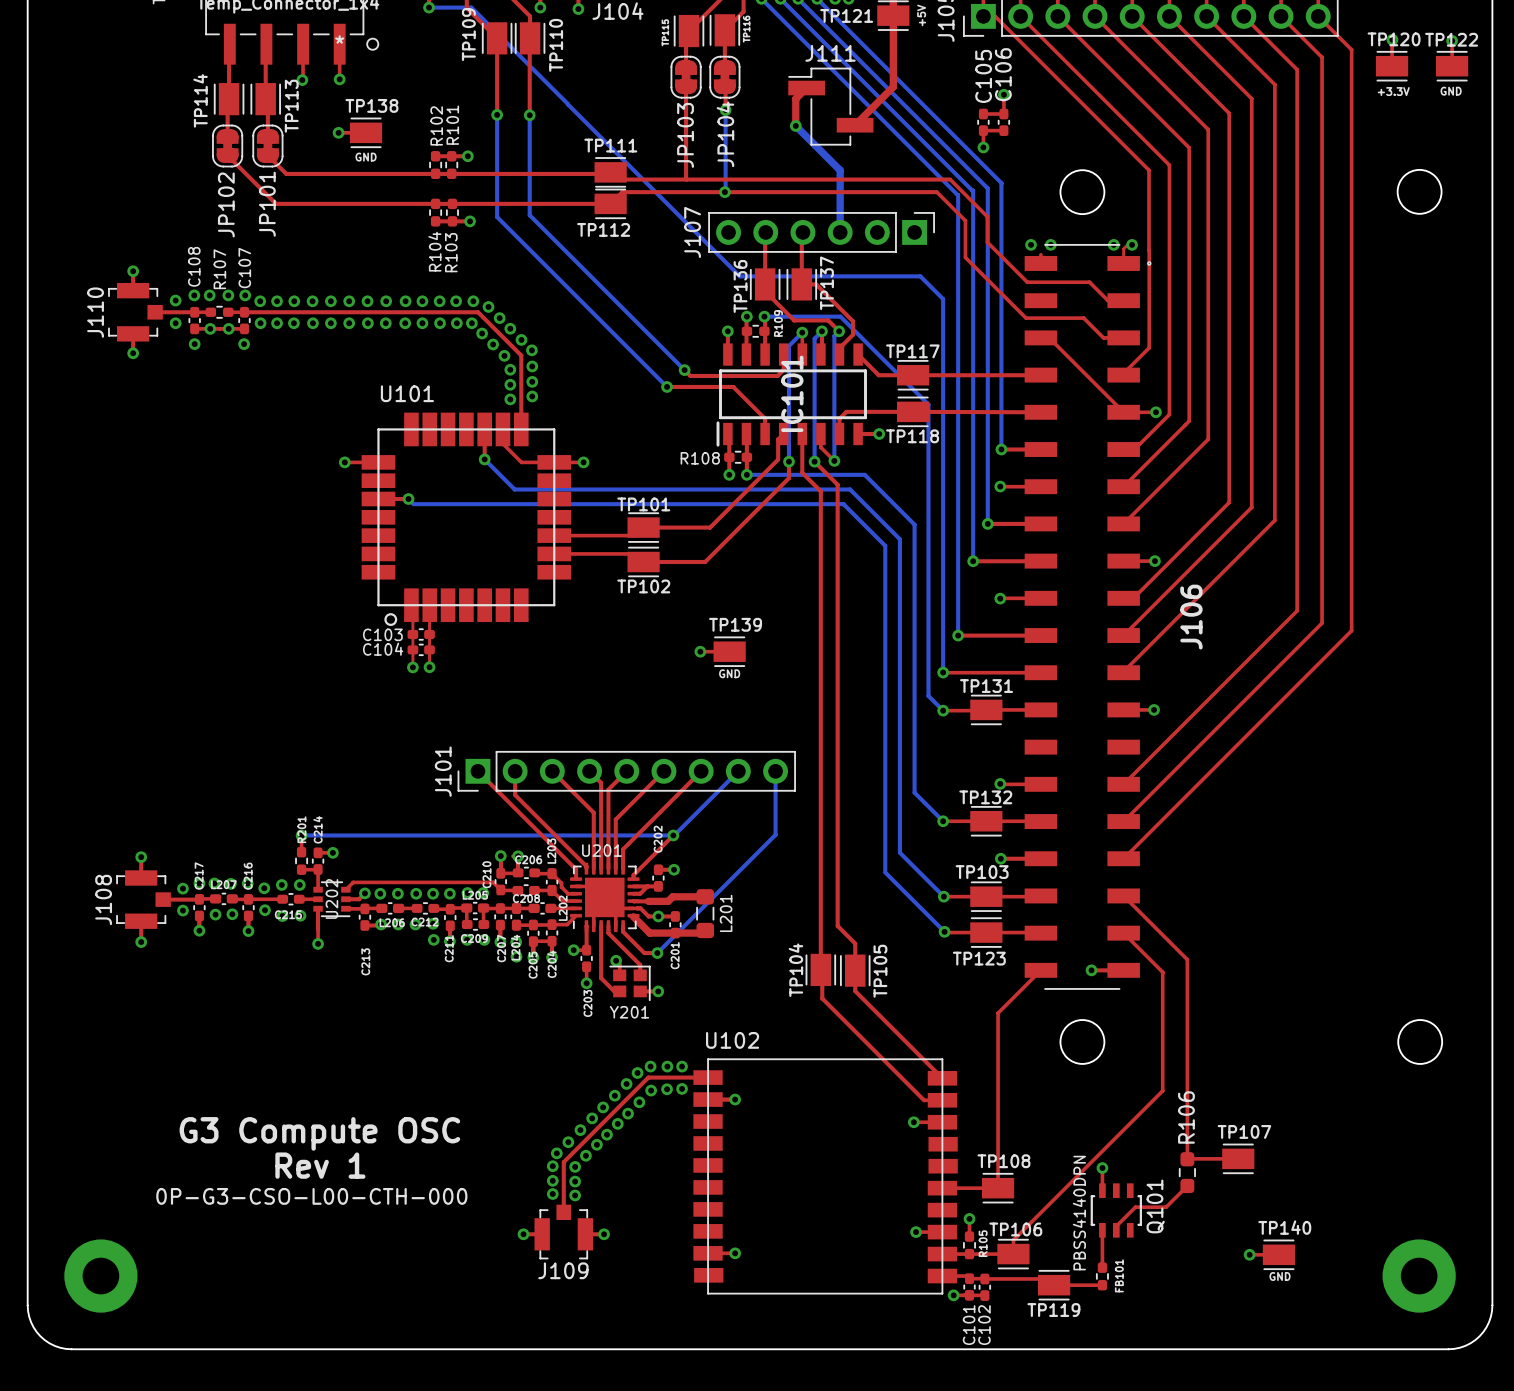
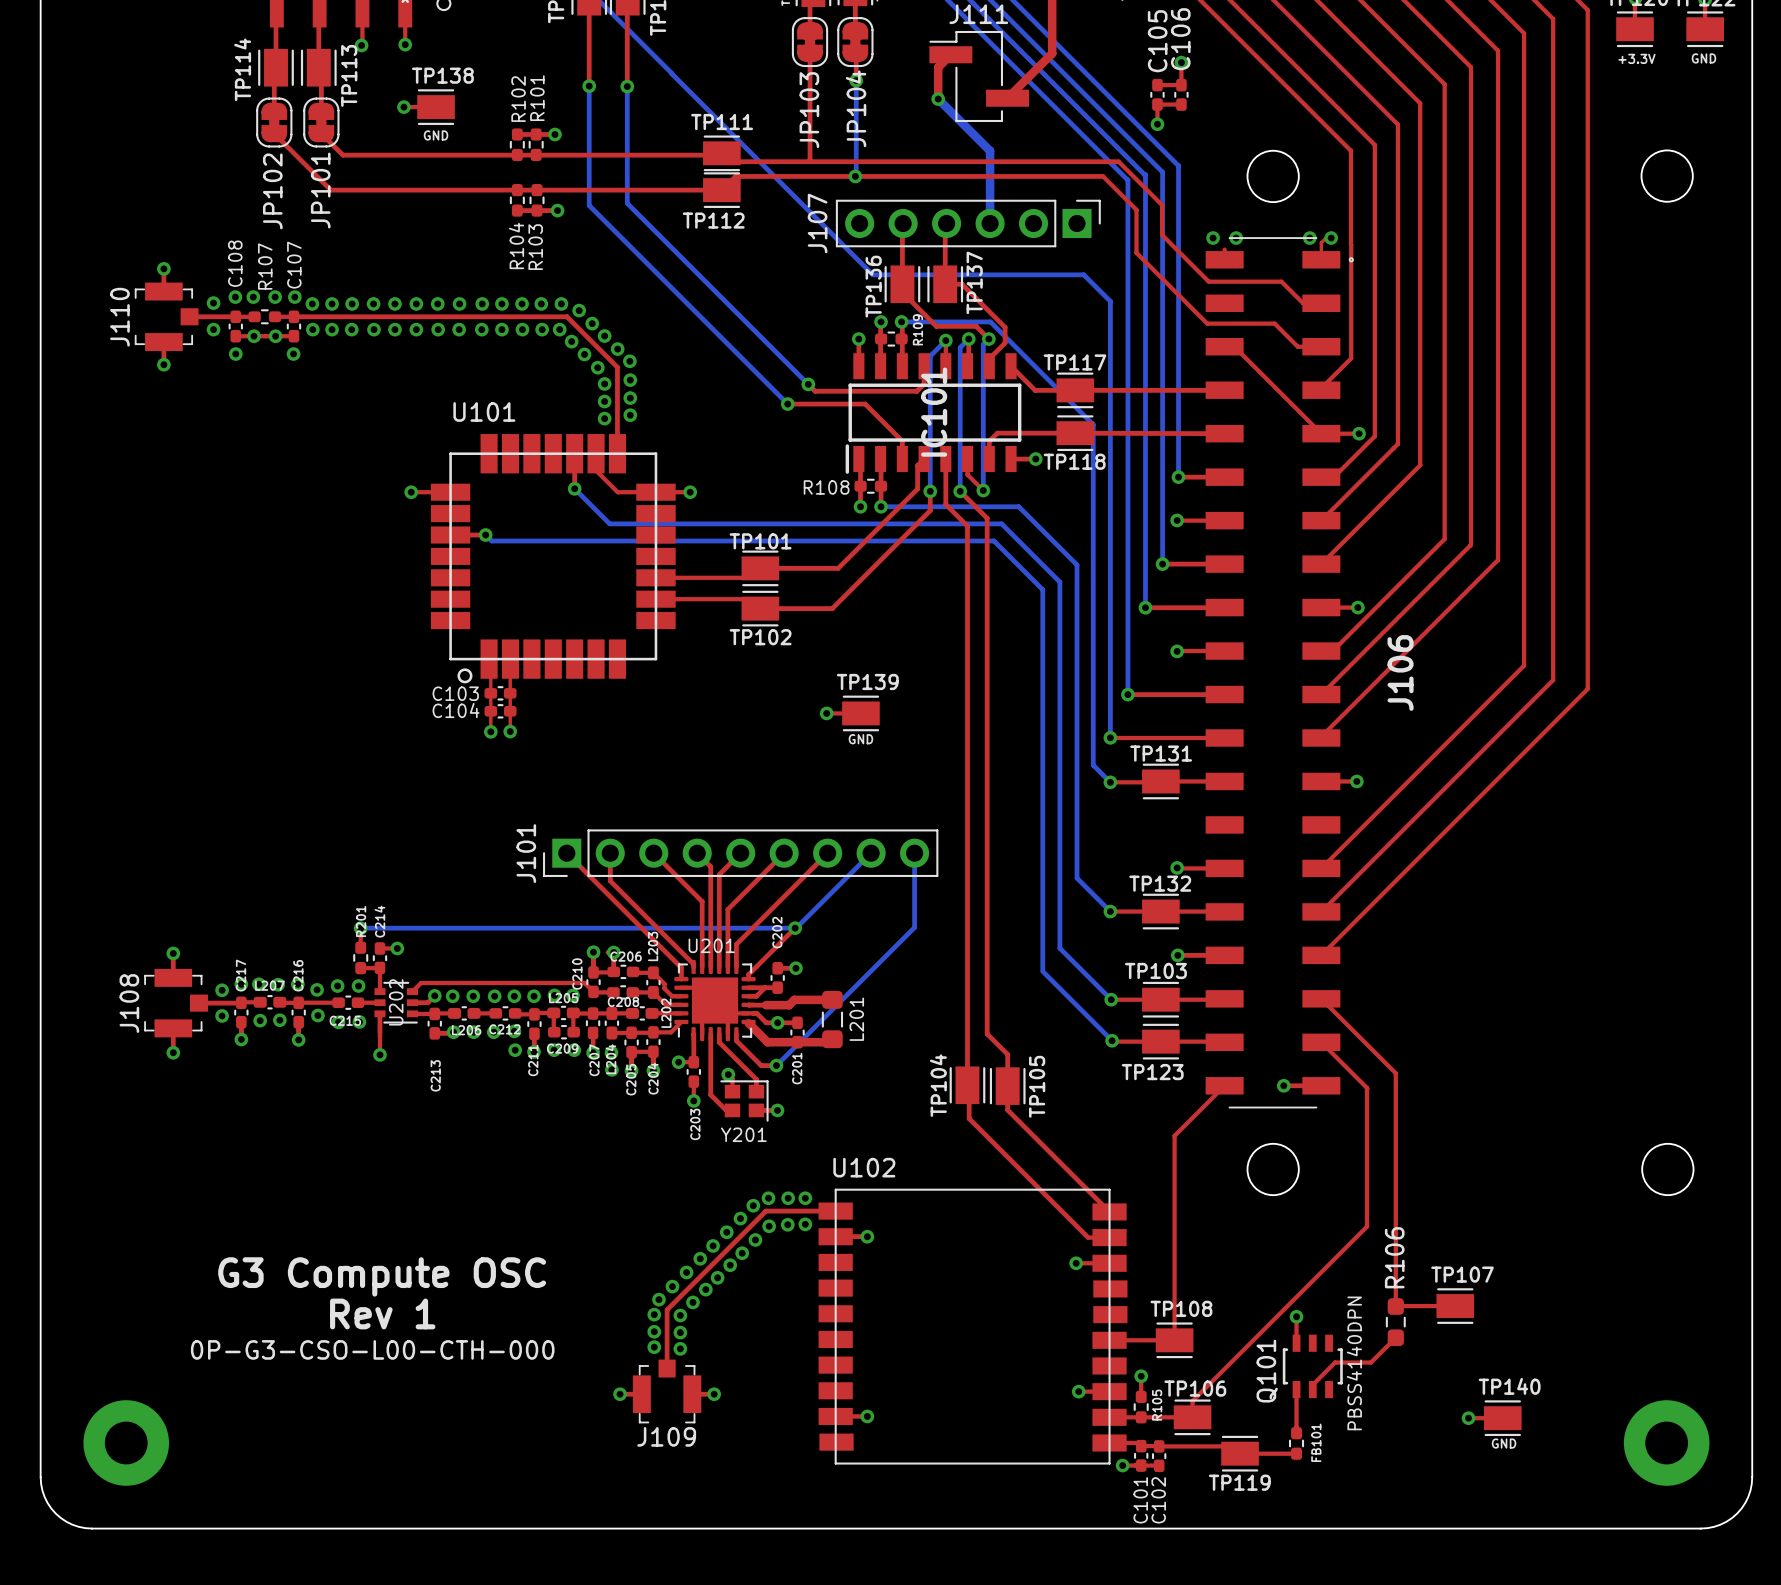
Q101 name position: Q101 (1155, 1206) -> Q101 (1267, 1371)
Q101 value position: PBSS4140DPN (1079, 1213) -> PBSS4140DPN (1354, 1363)

